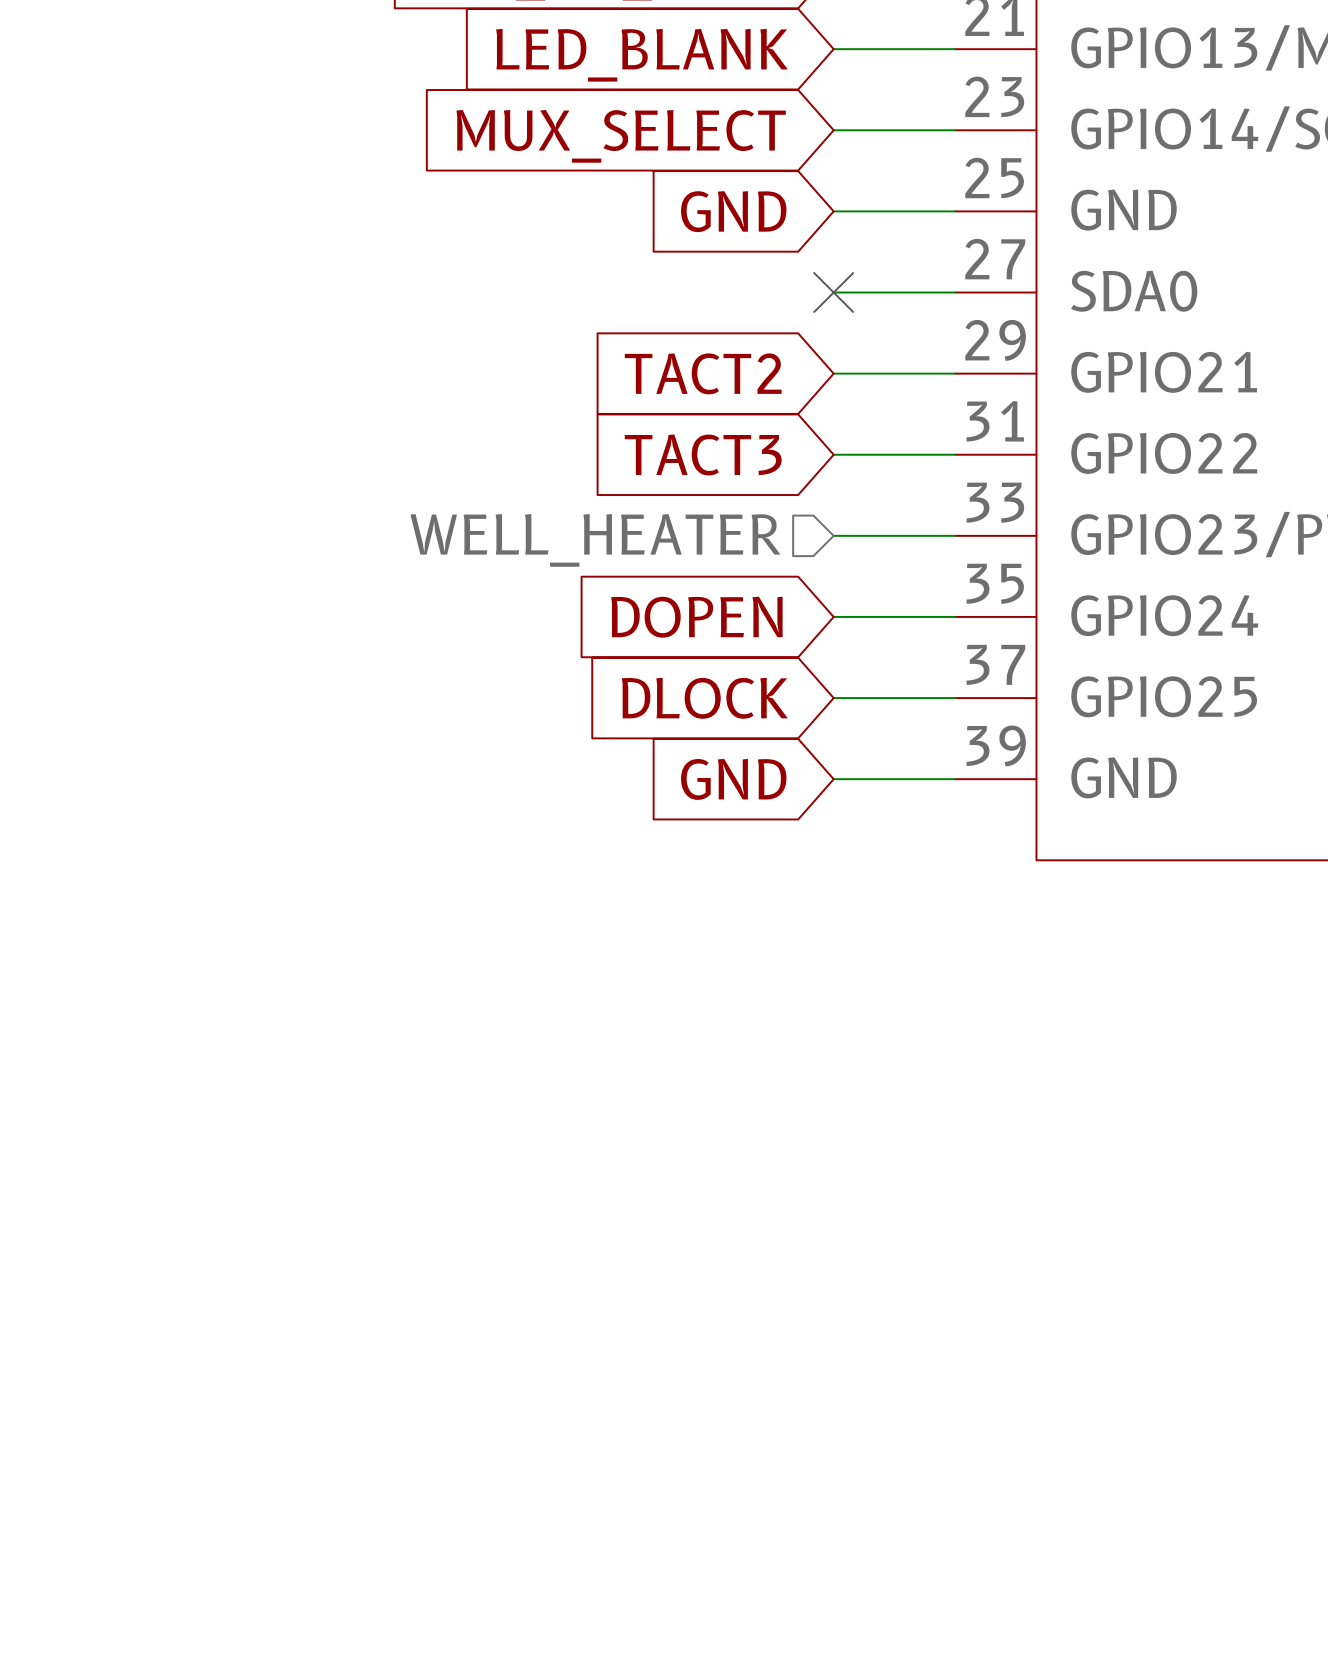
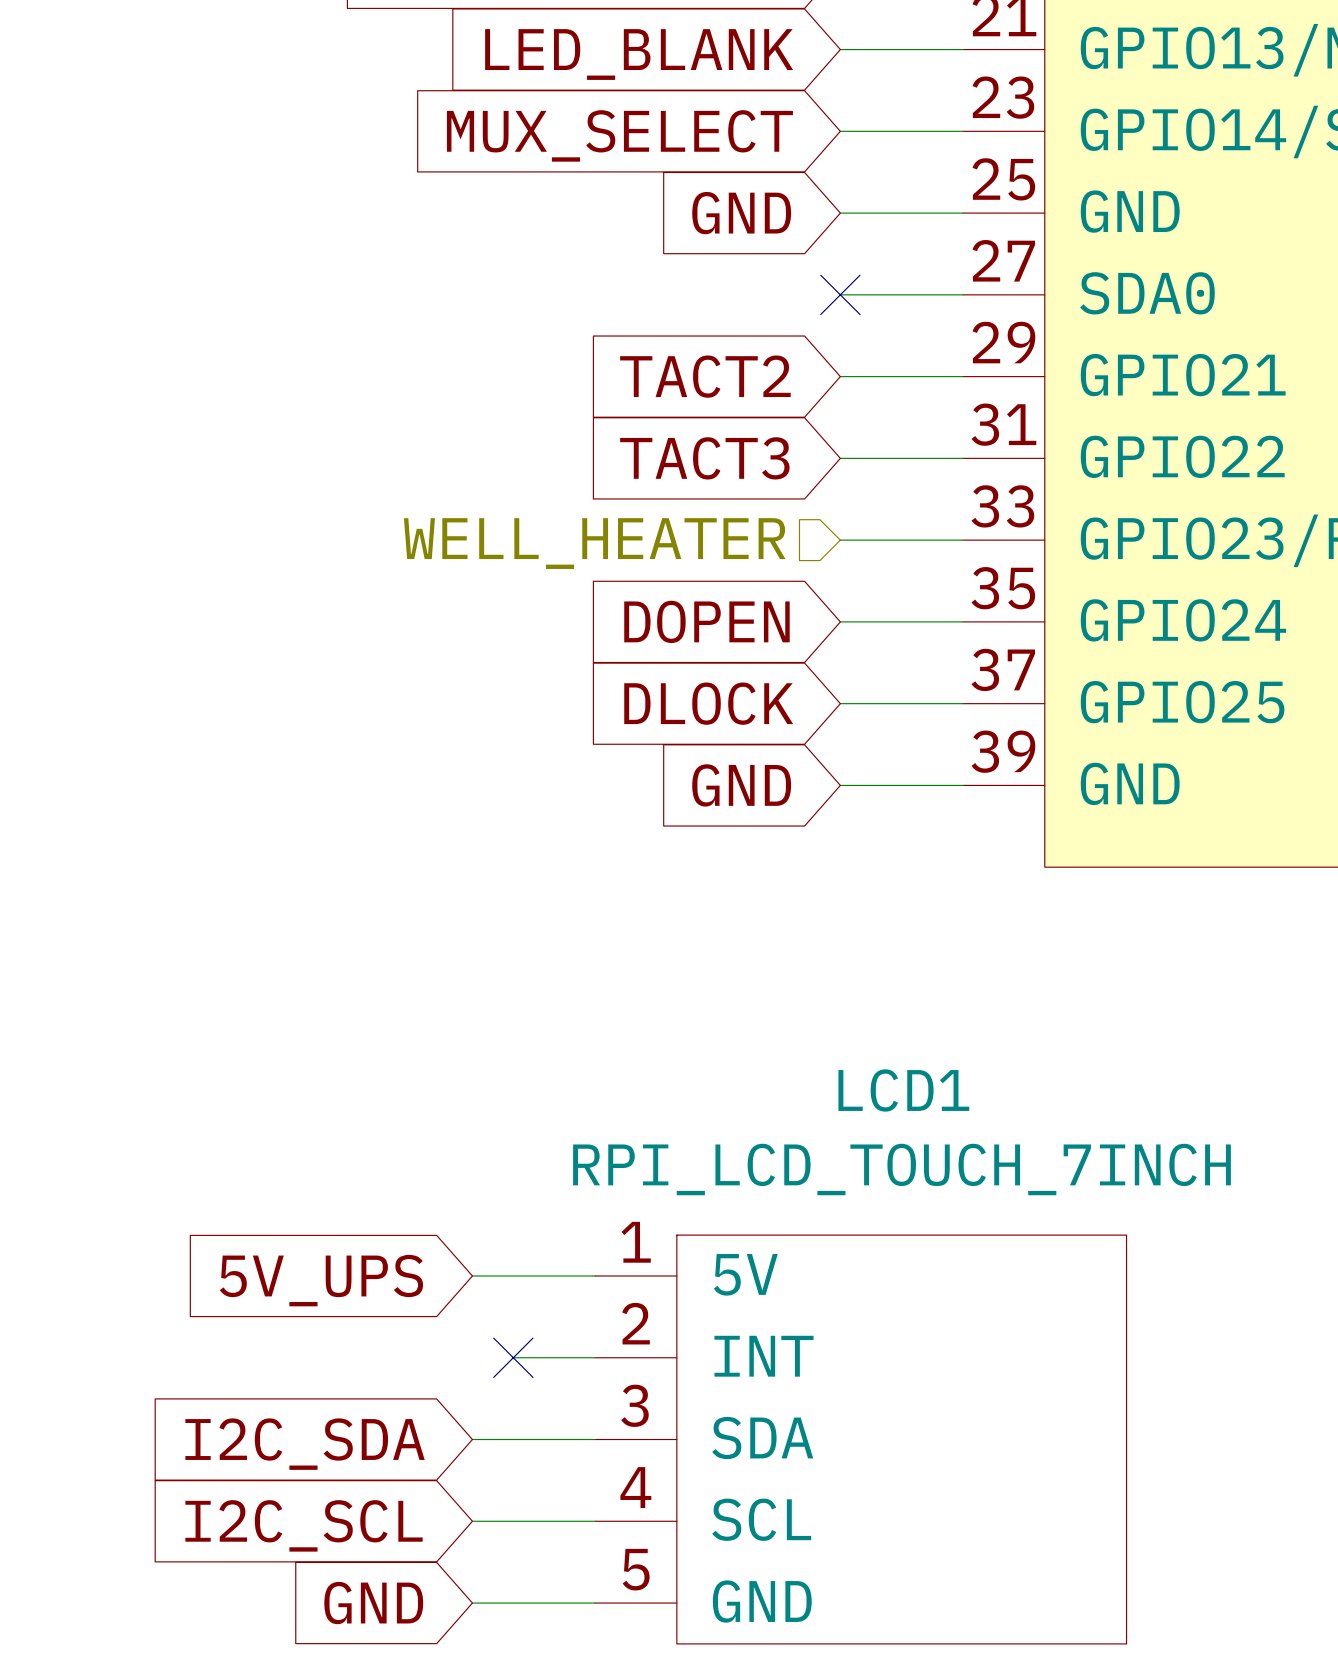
wire: none -> (472, 1275) (595, 1275)
global label: none -> 5V_UPS (321, 1280)
wire: none -> (513, 1357) (595, 1357)
no-connect mark: none -> (513, 1357)
wire: none -> (472, 1439) (595, 1439)
LCD1: none -> RPI_LCD_TOUCH_7INCH (860, 1439)
global label: none -> I2C_SDA (305, 1444)
wire: none -> (472, 1521) (595, 1521)
global label: none -> I2C_SCL (304, 1525)
global label: none -> GND (373, 1603)
wire: none -> (472, 1603) (595, 1603)

